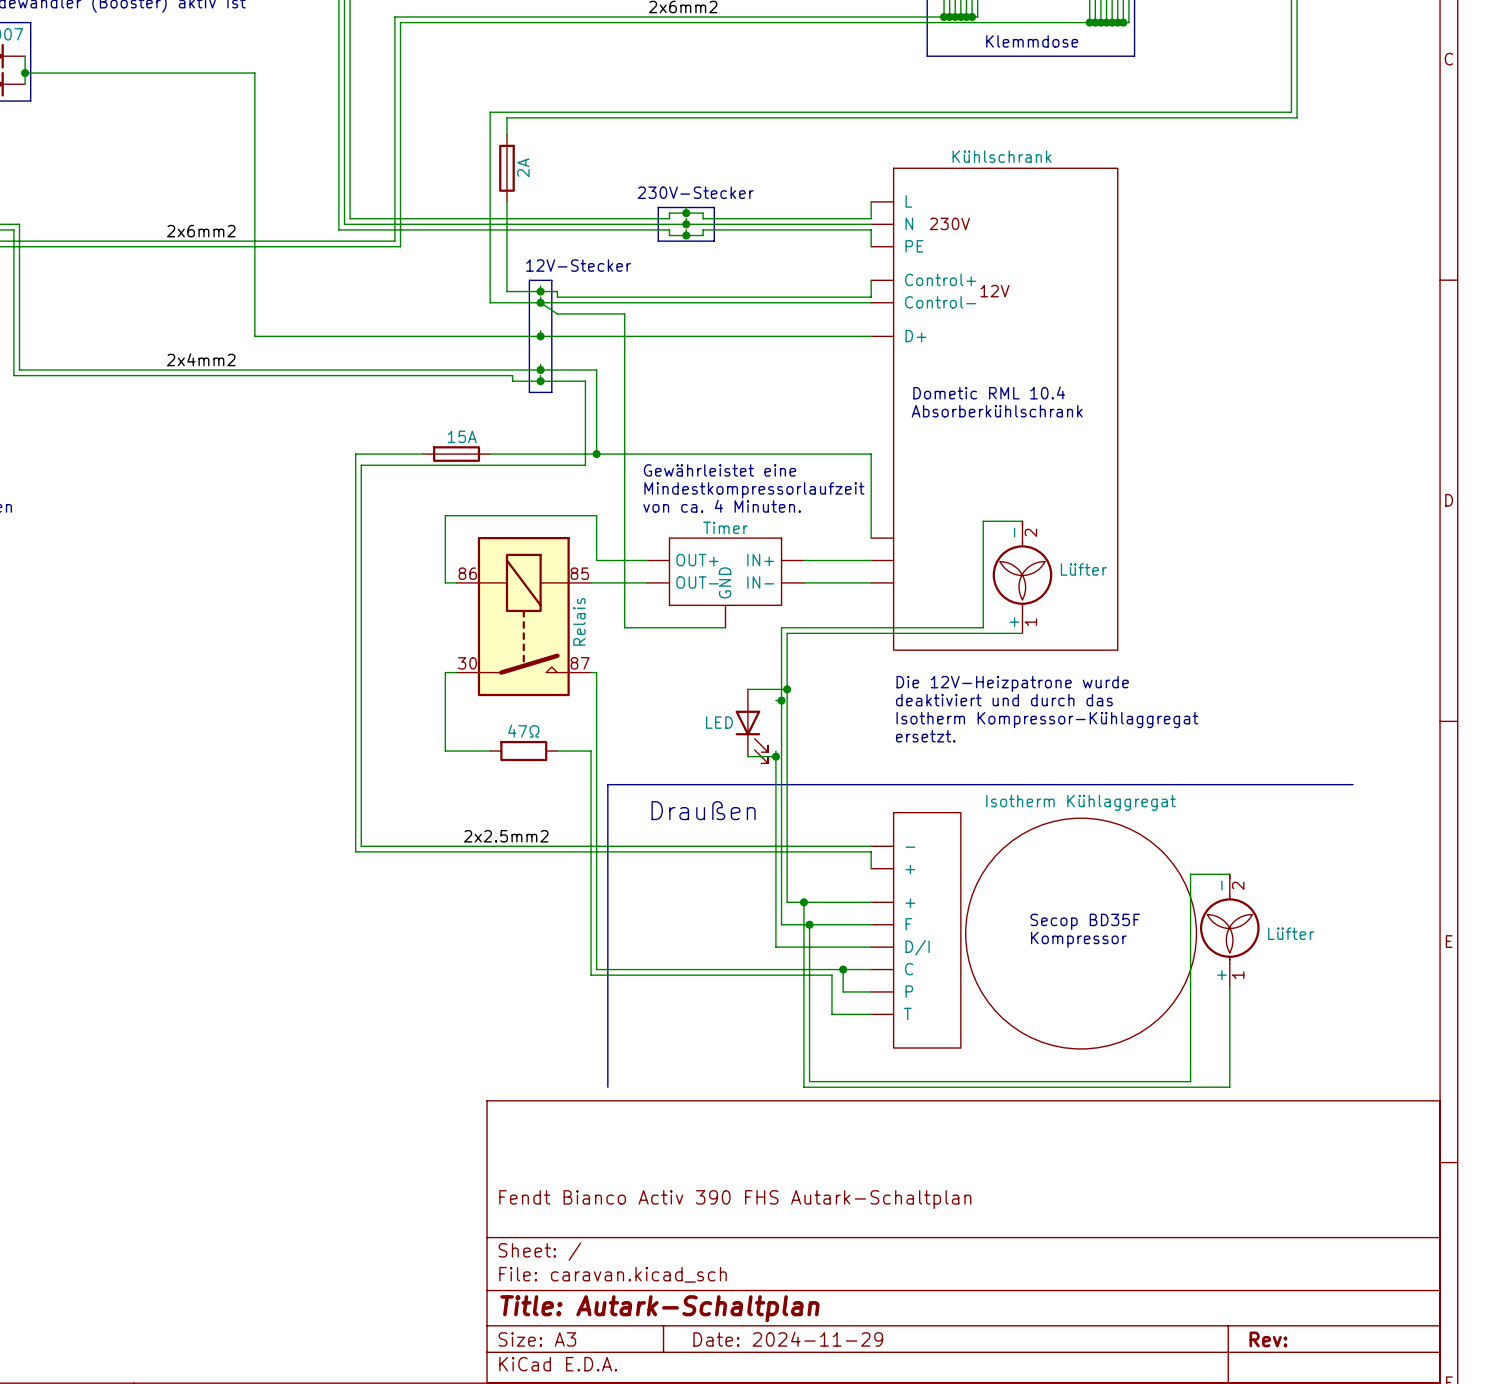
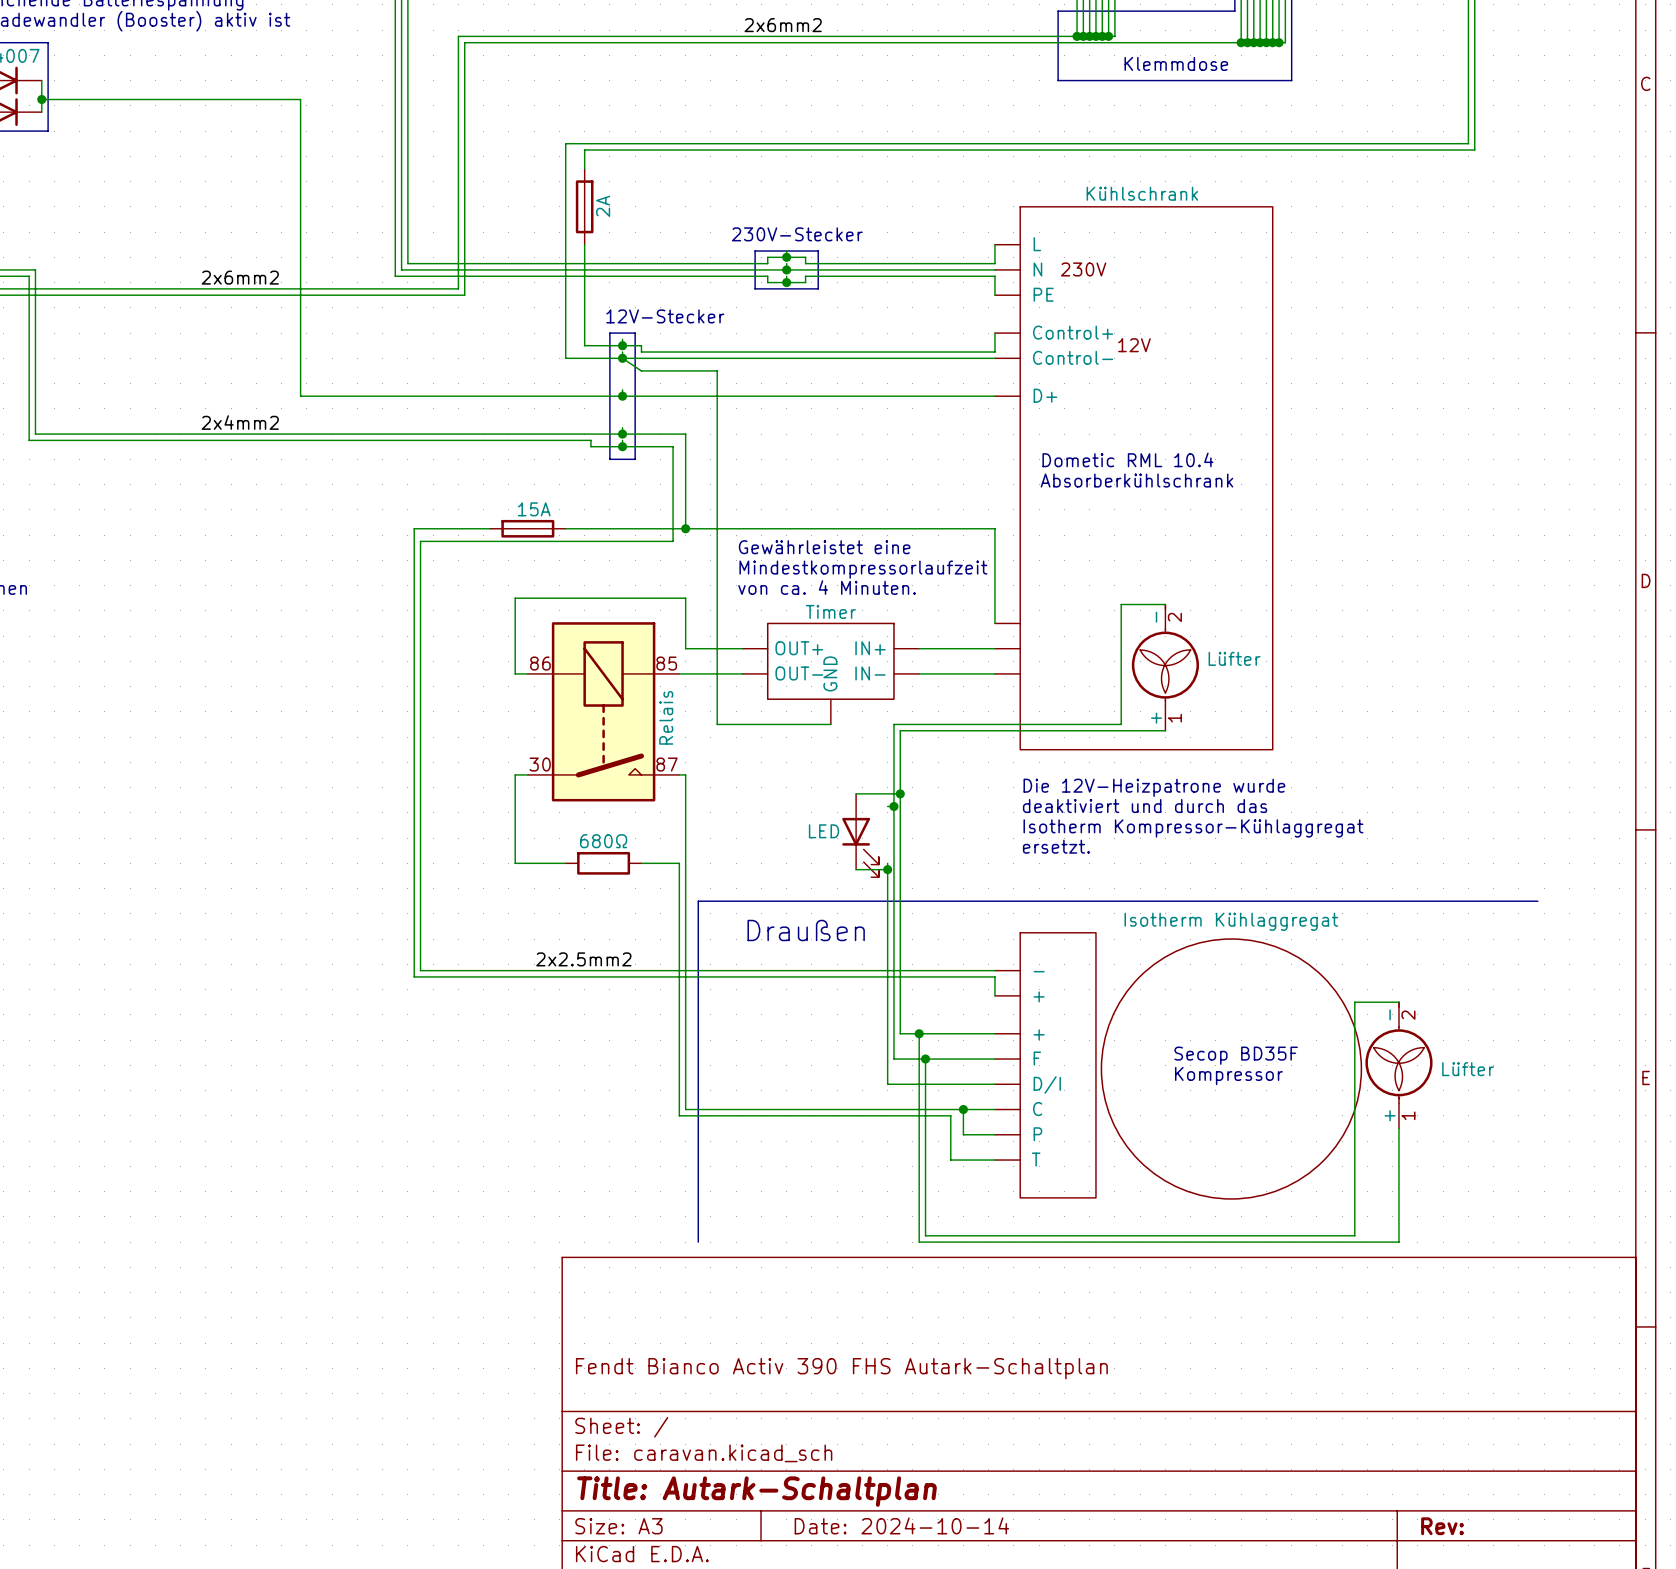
part value: 47Ω (523, 731) -> 680Ω (603, 841)
title block: Date: 2024-11-29 (788, 1339) -> Date: 2024-10-14 (901, 1525)

